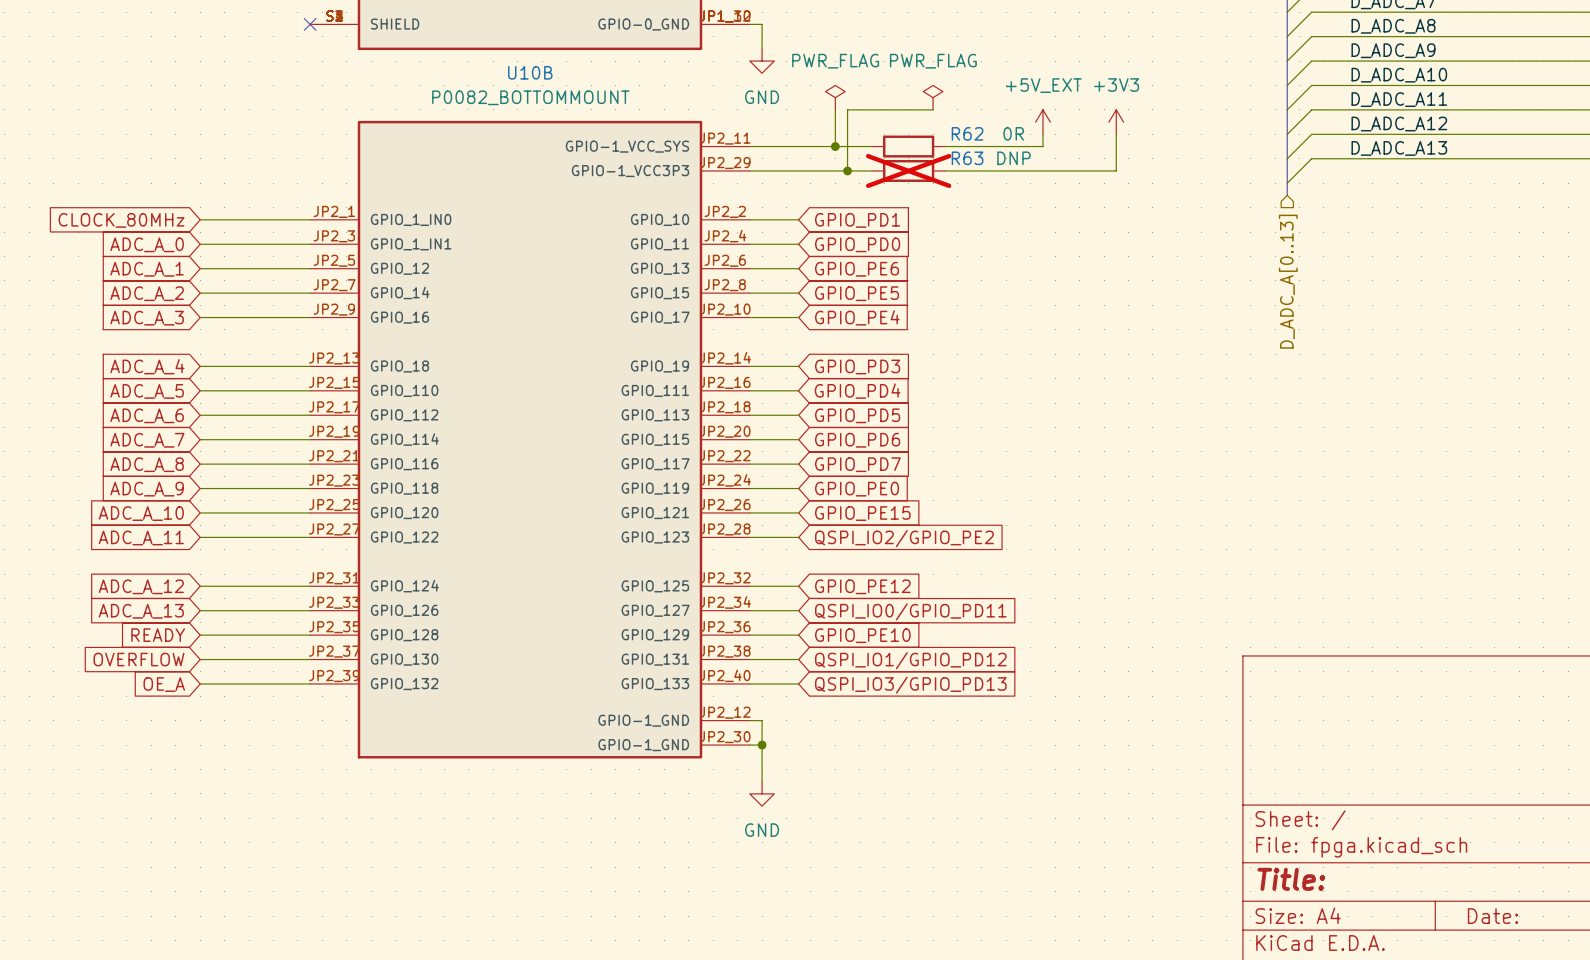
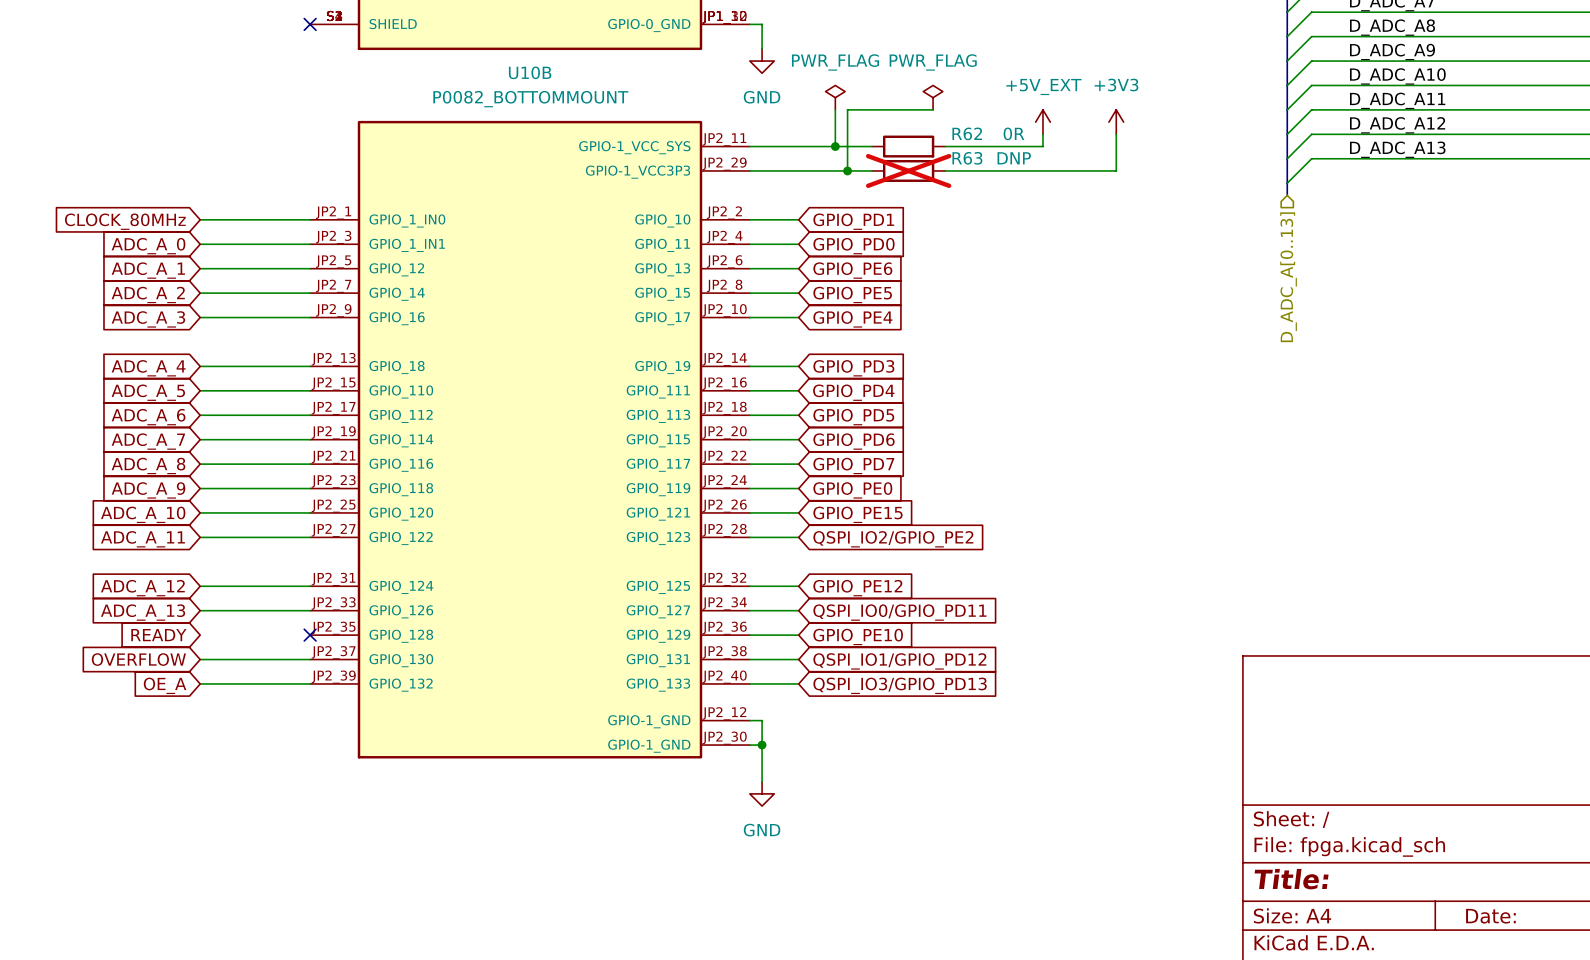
wire: (200, 635) (310, 635) -> none
no-connect mark: none -> (310, 635)

